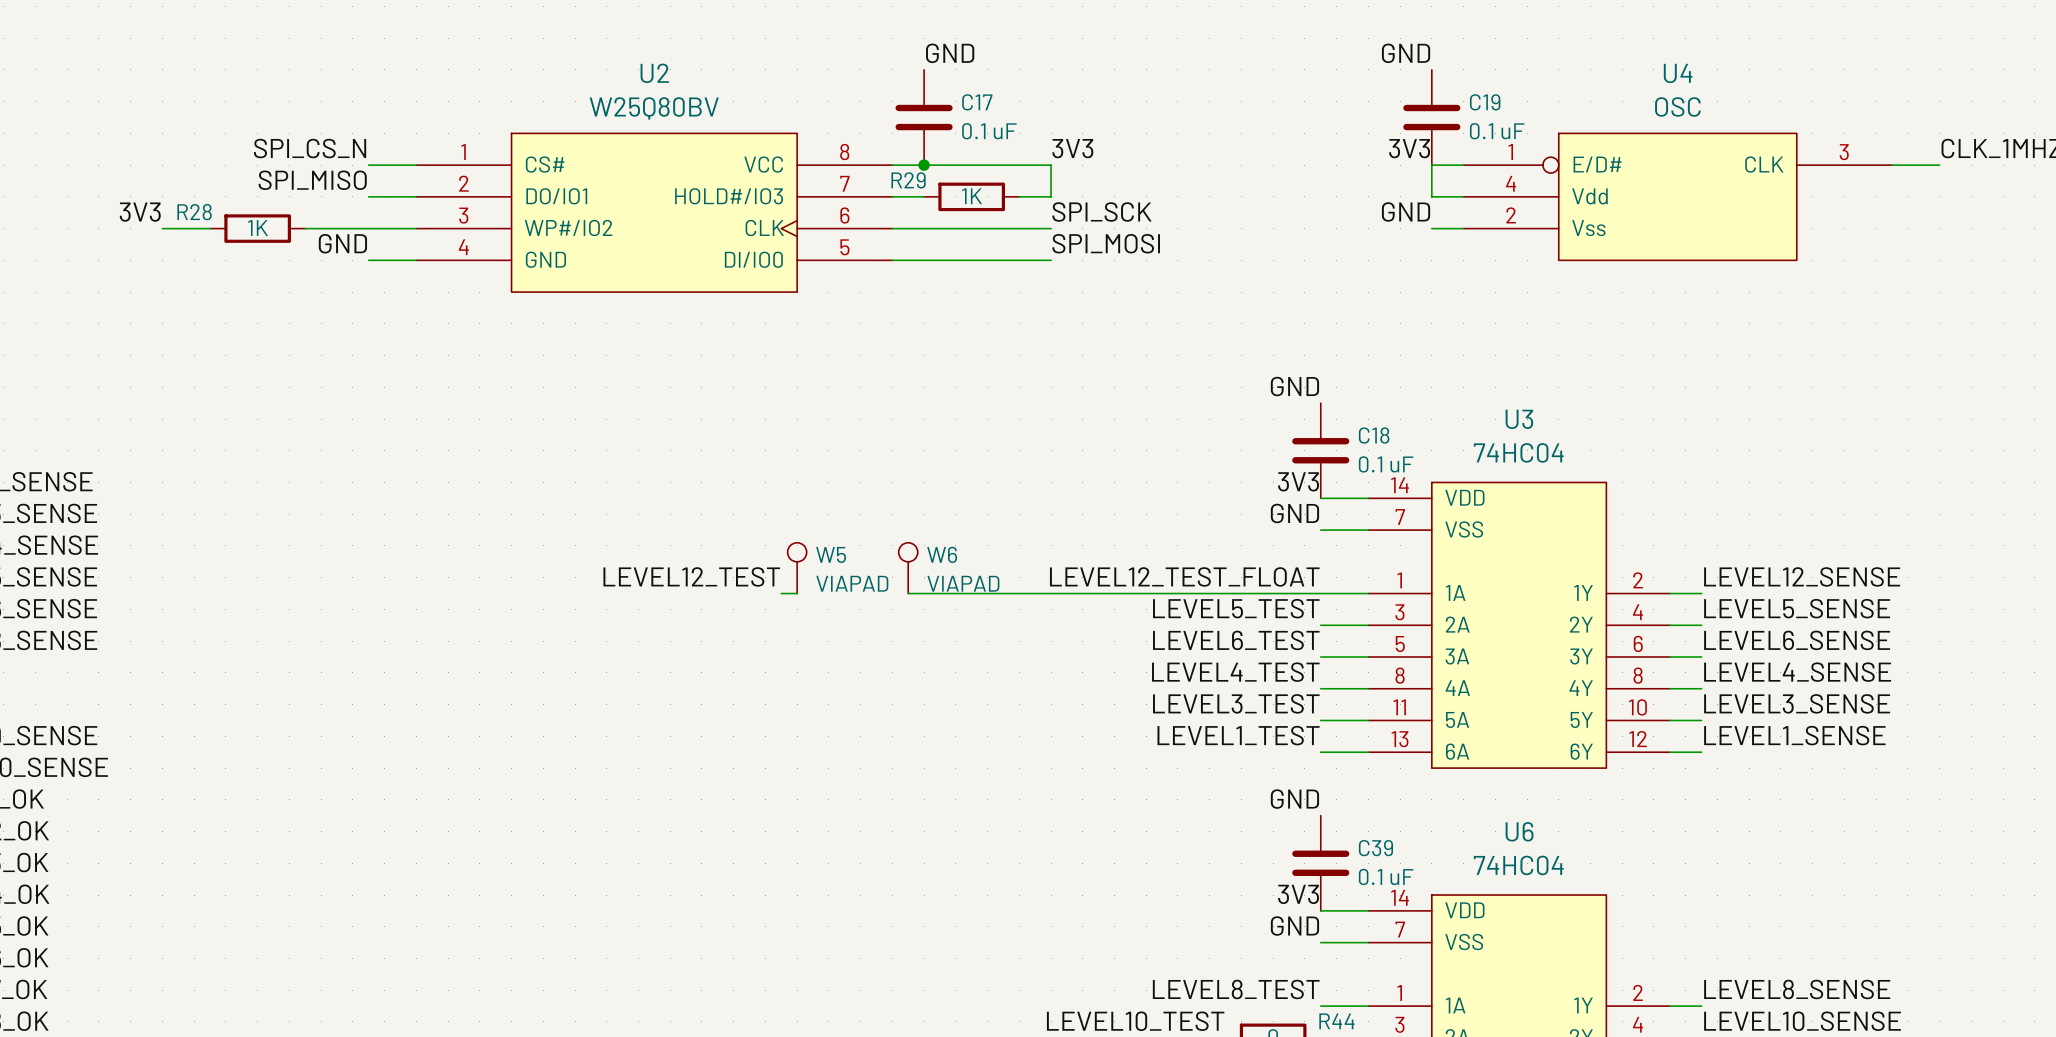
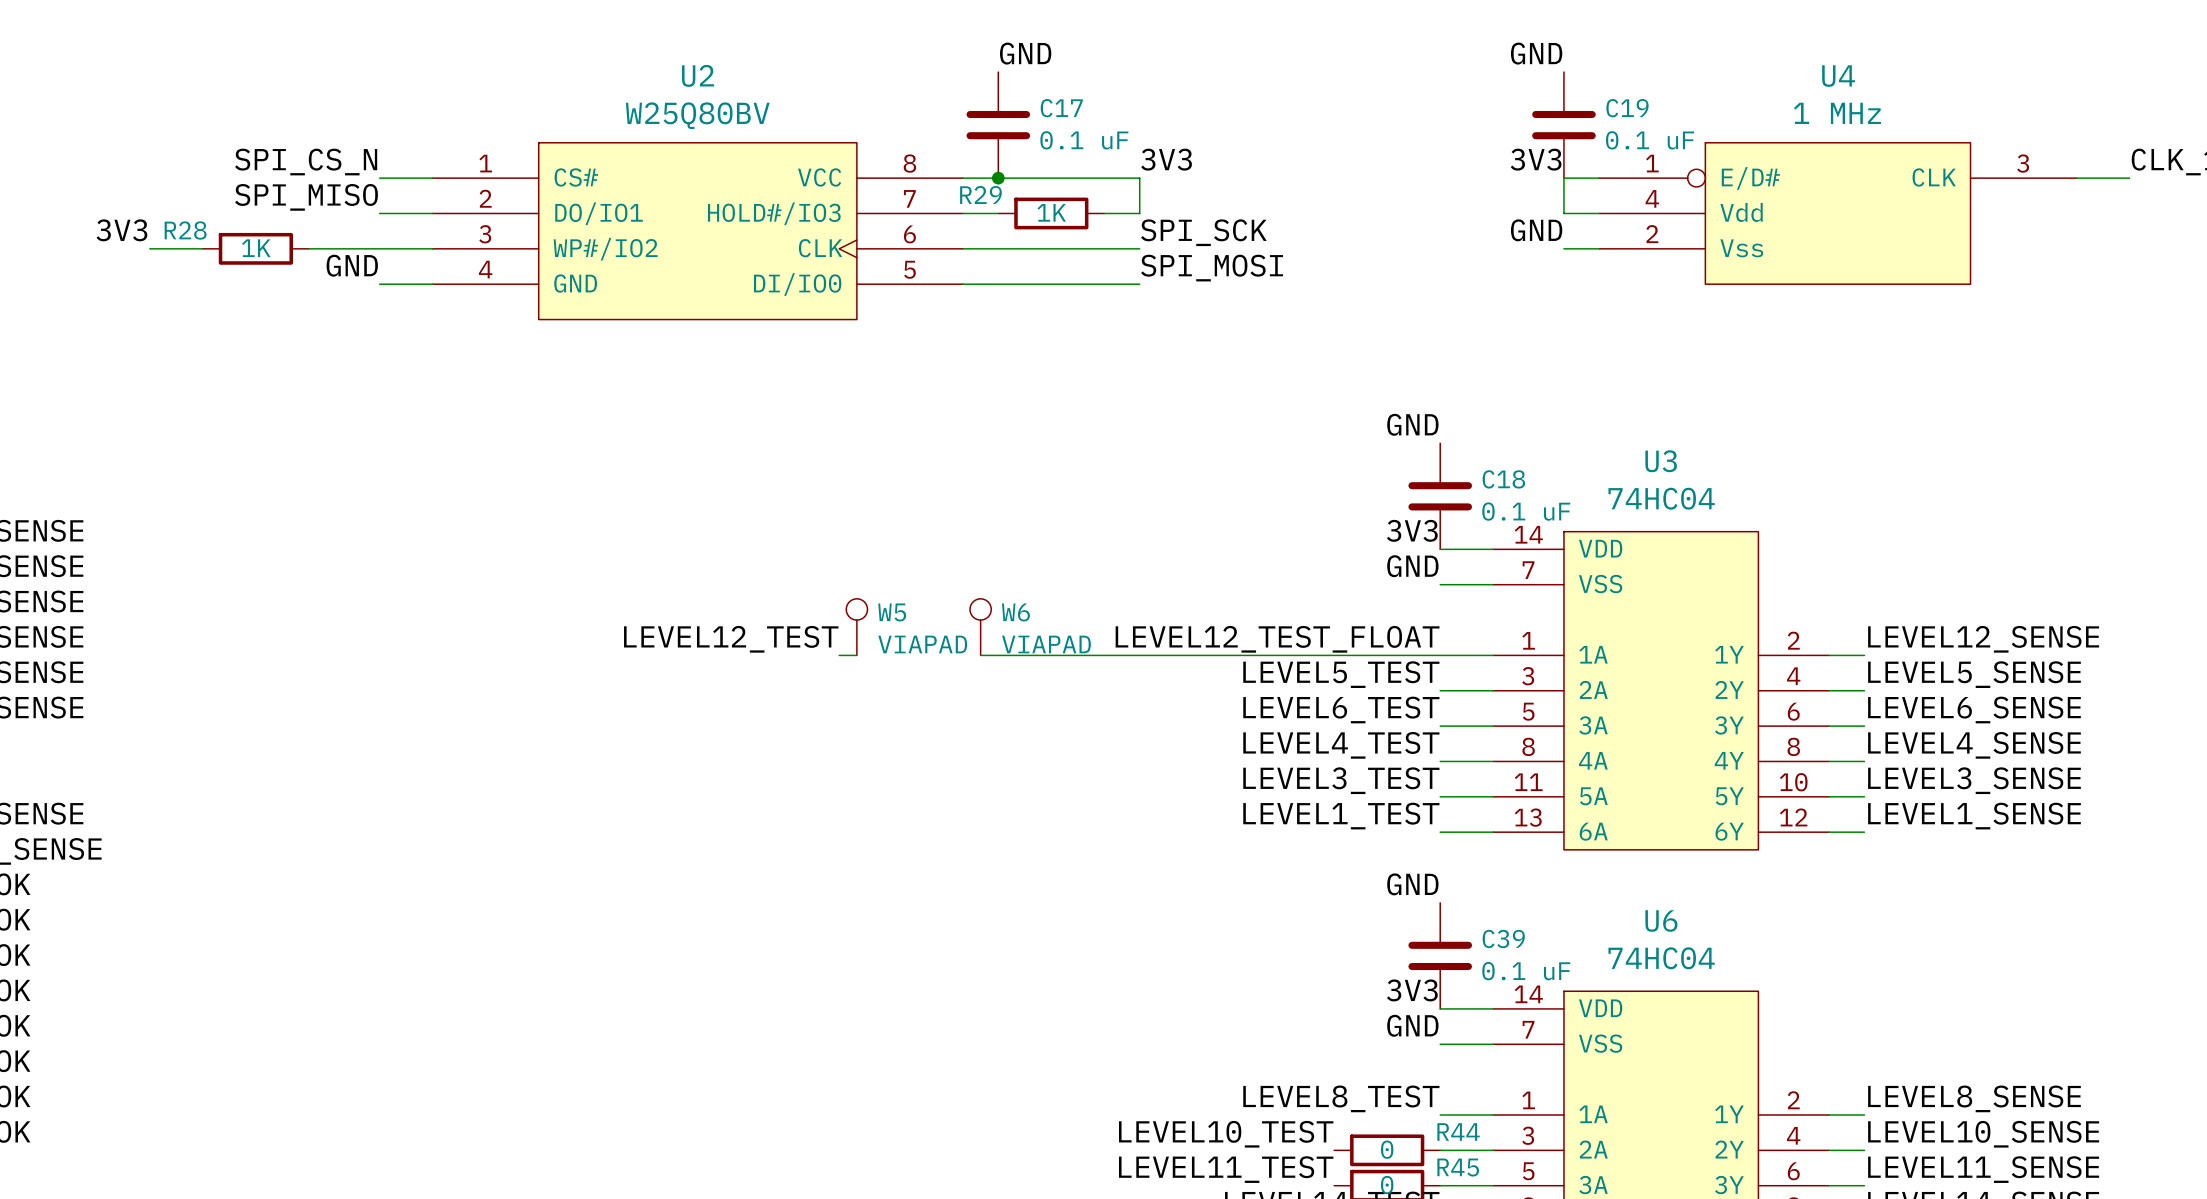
U4 value: OSC (1677, 106) -> 1 MHz (1837, 113)

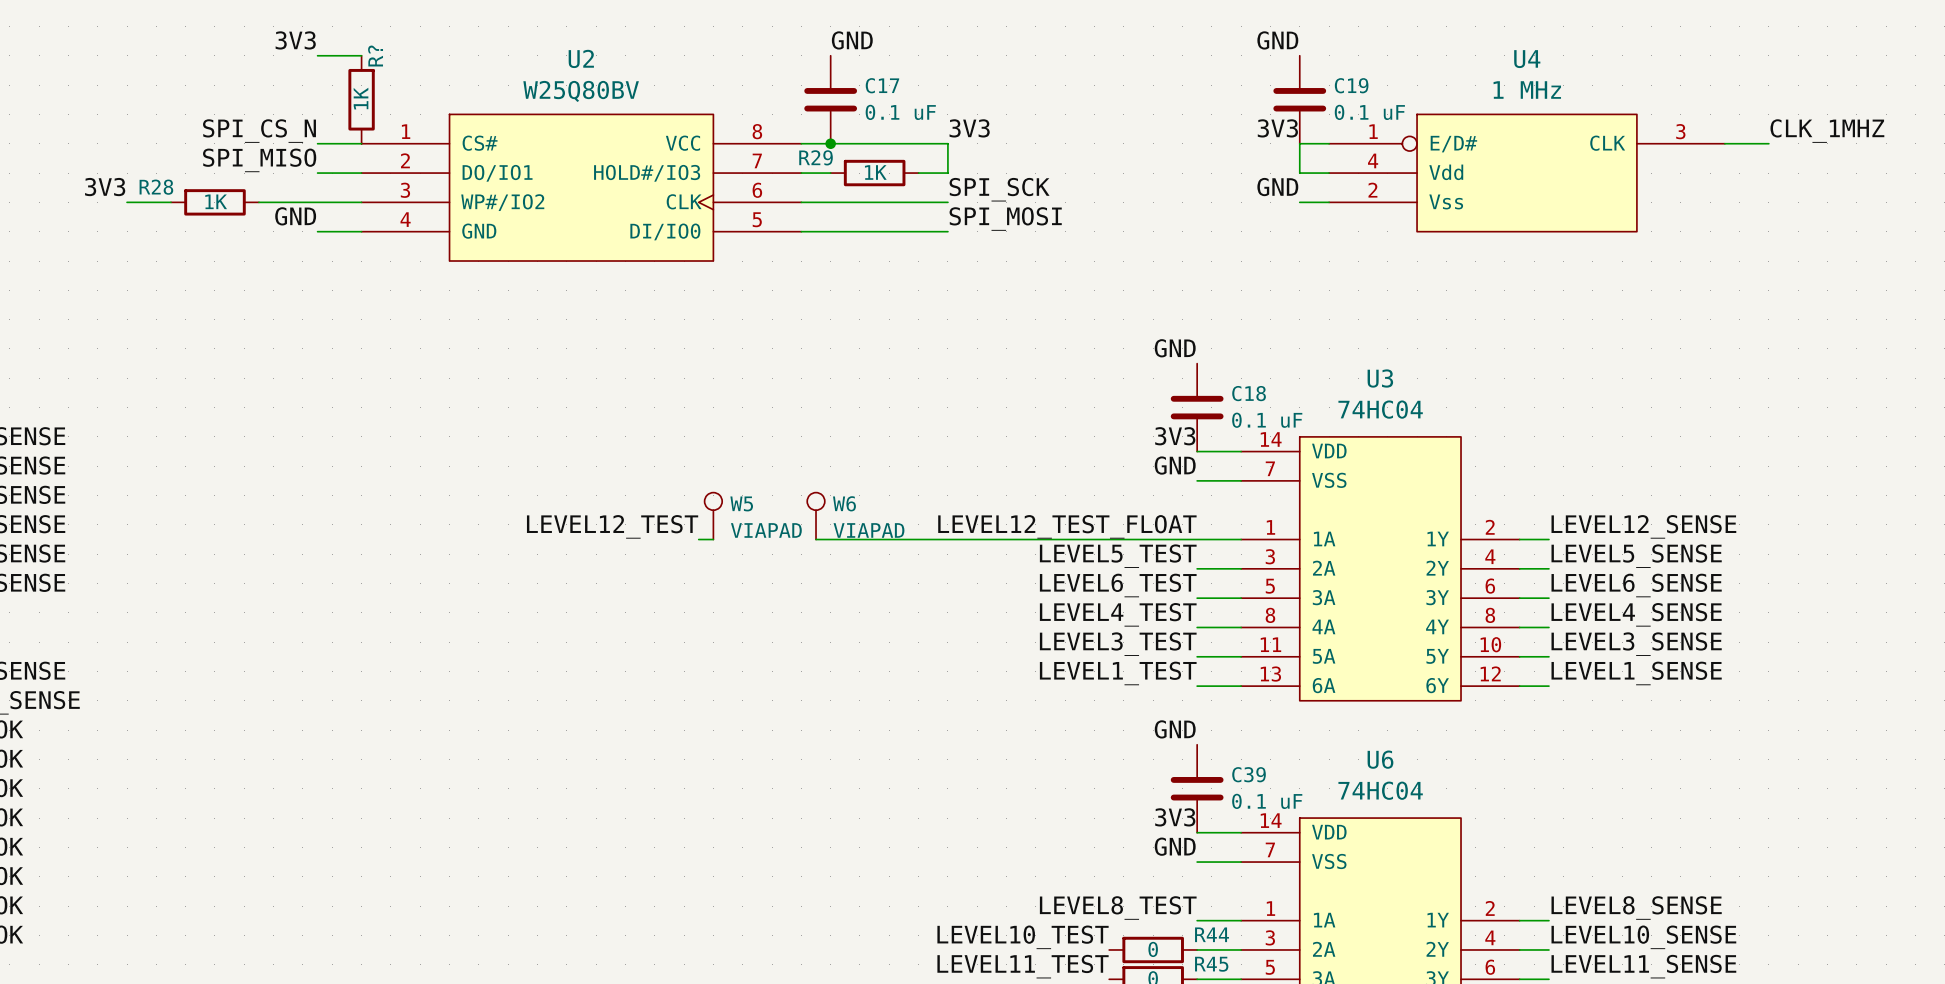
label: none -> 3V3 (295, 40)
wire: none -> (317, 55) (361, 55)
R?: none -> 1K (361, 99)

